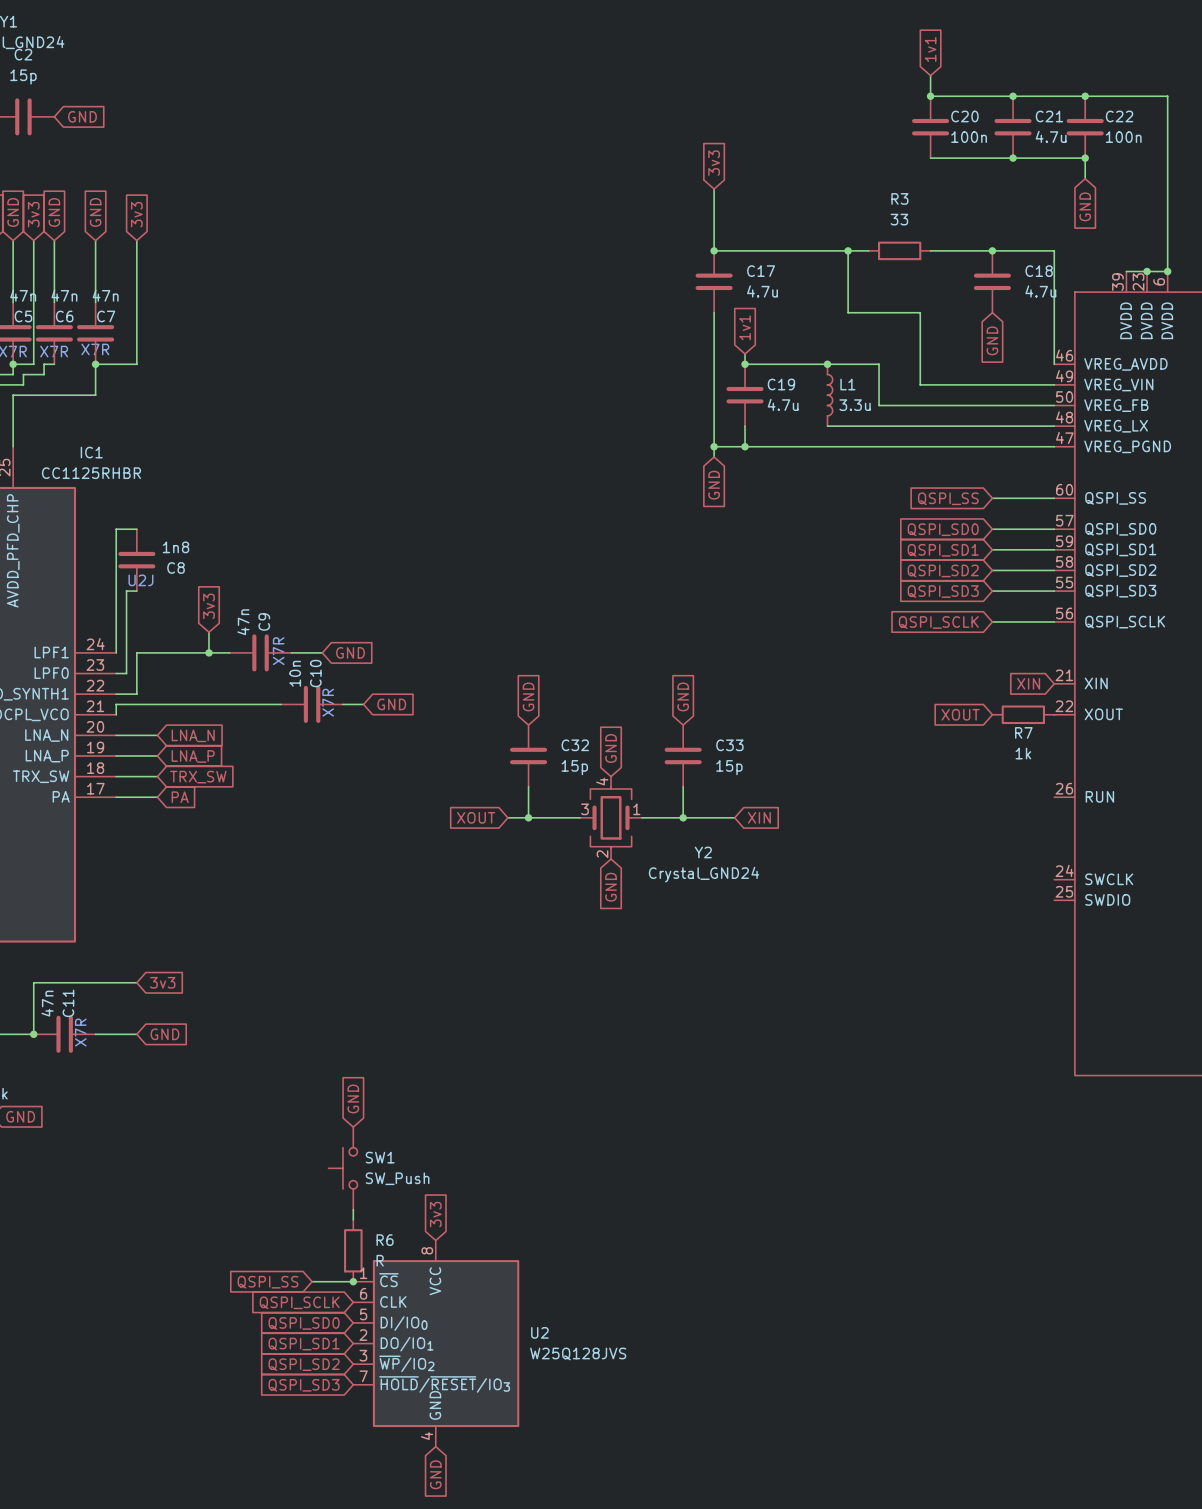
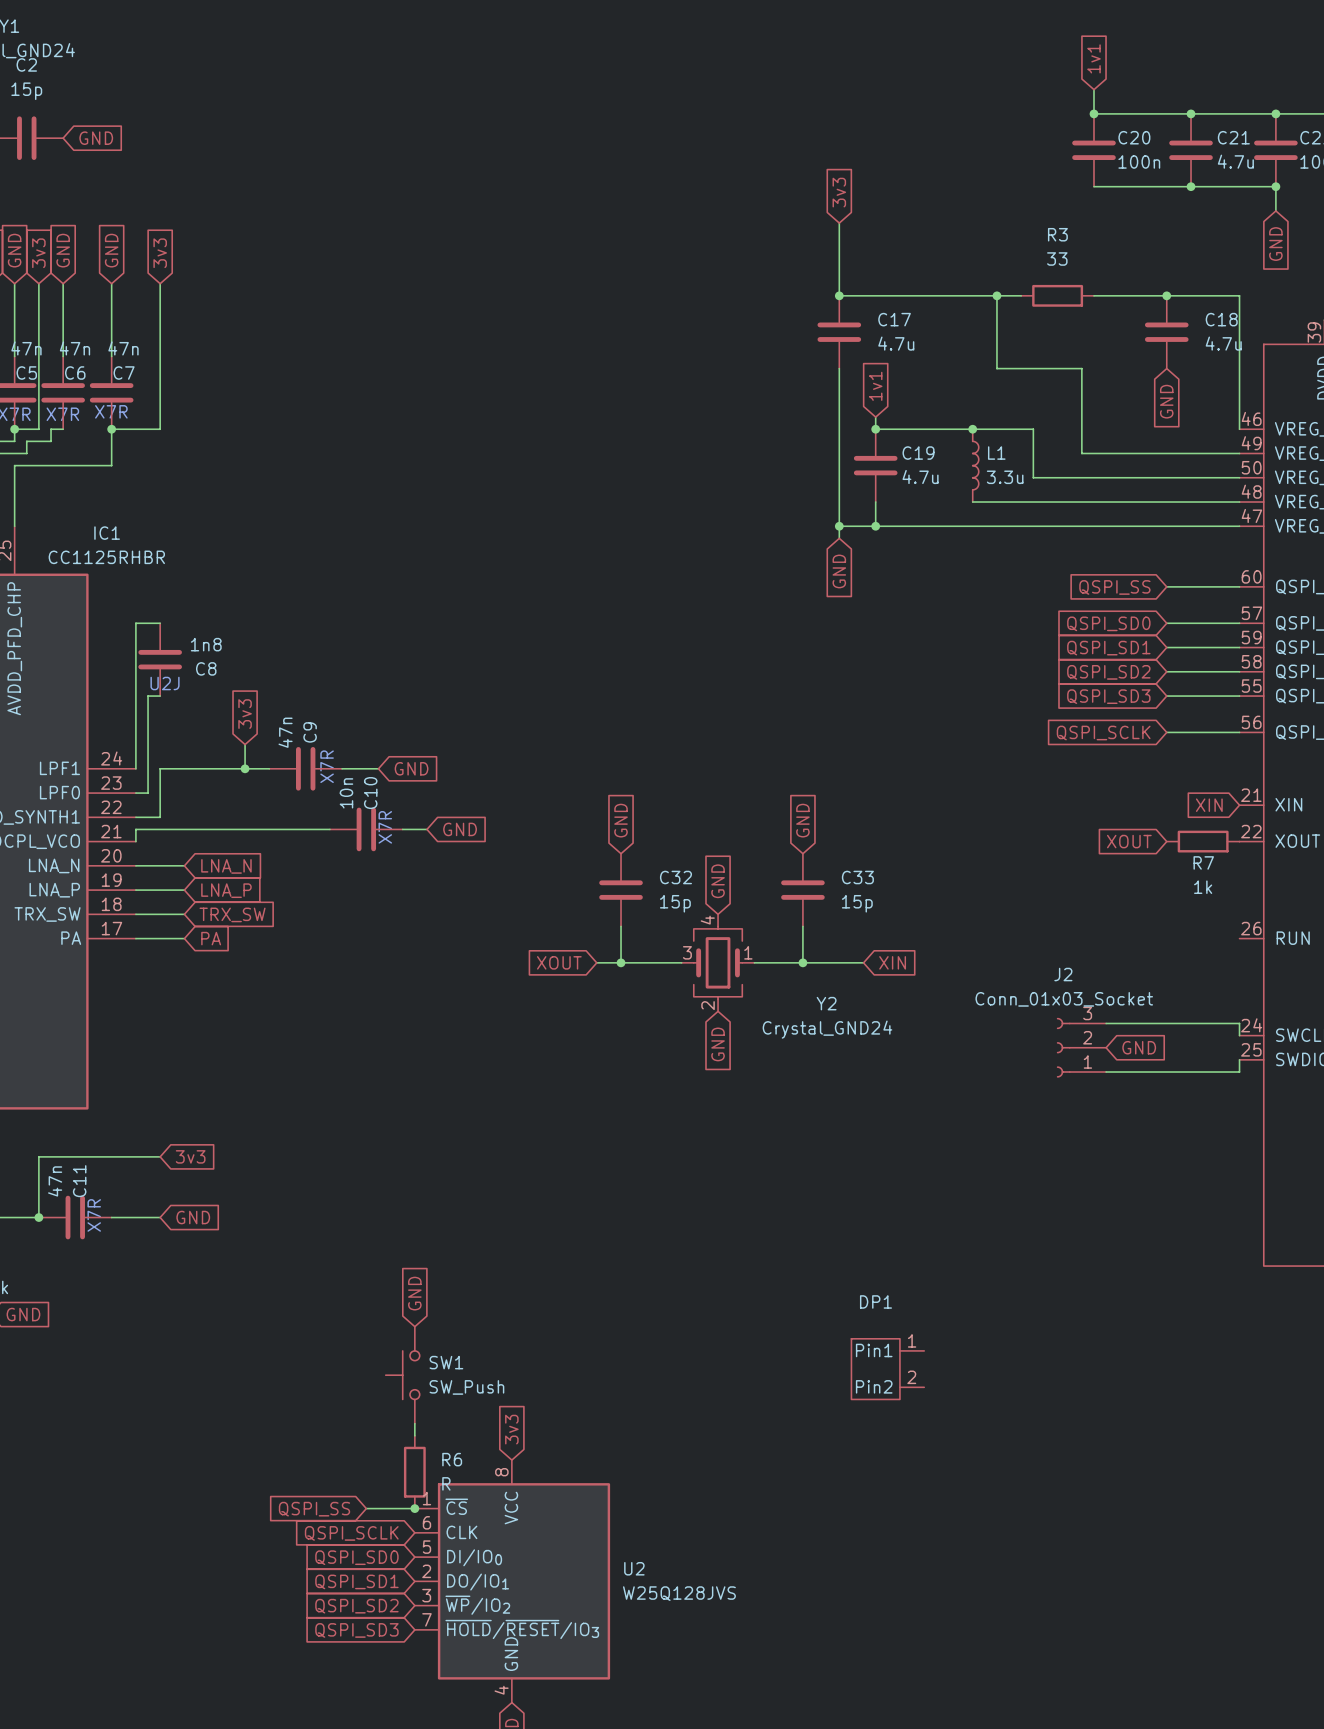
wire: none -> (1106, 1023) (1239, 1023) (1239, 1035)
J2: none -> Conn_01x03_Socket (1081, 1047)
global label: none -> GND (1139, 1047)
wire: none -> (1239, 1059) (1239, 1072) (1106, 1072)
DP1: none -> (887, 1369)

